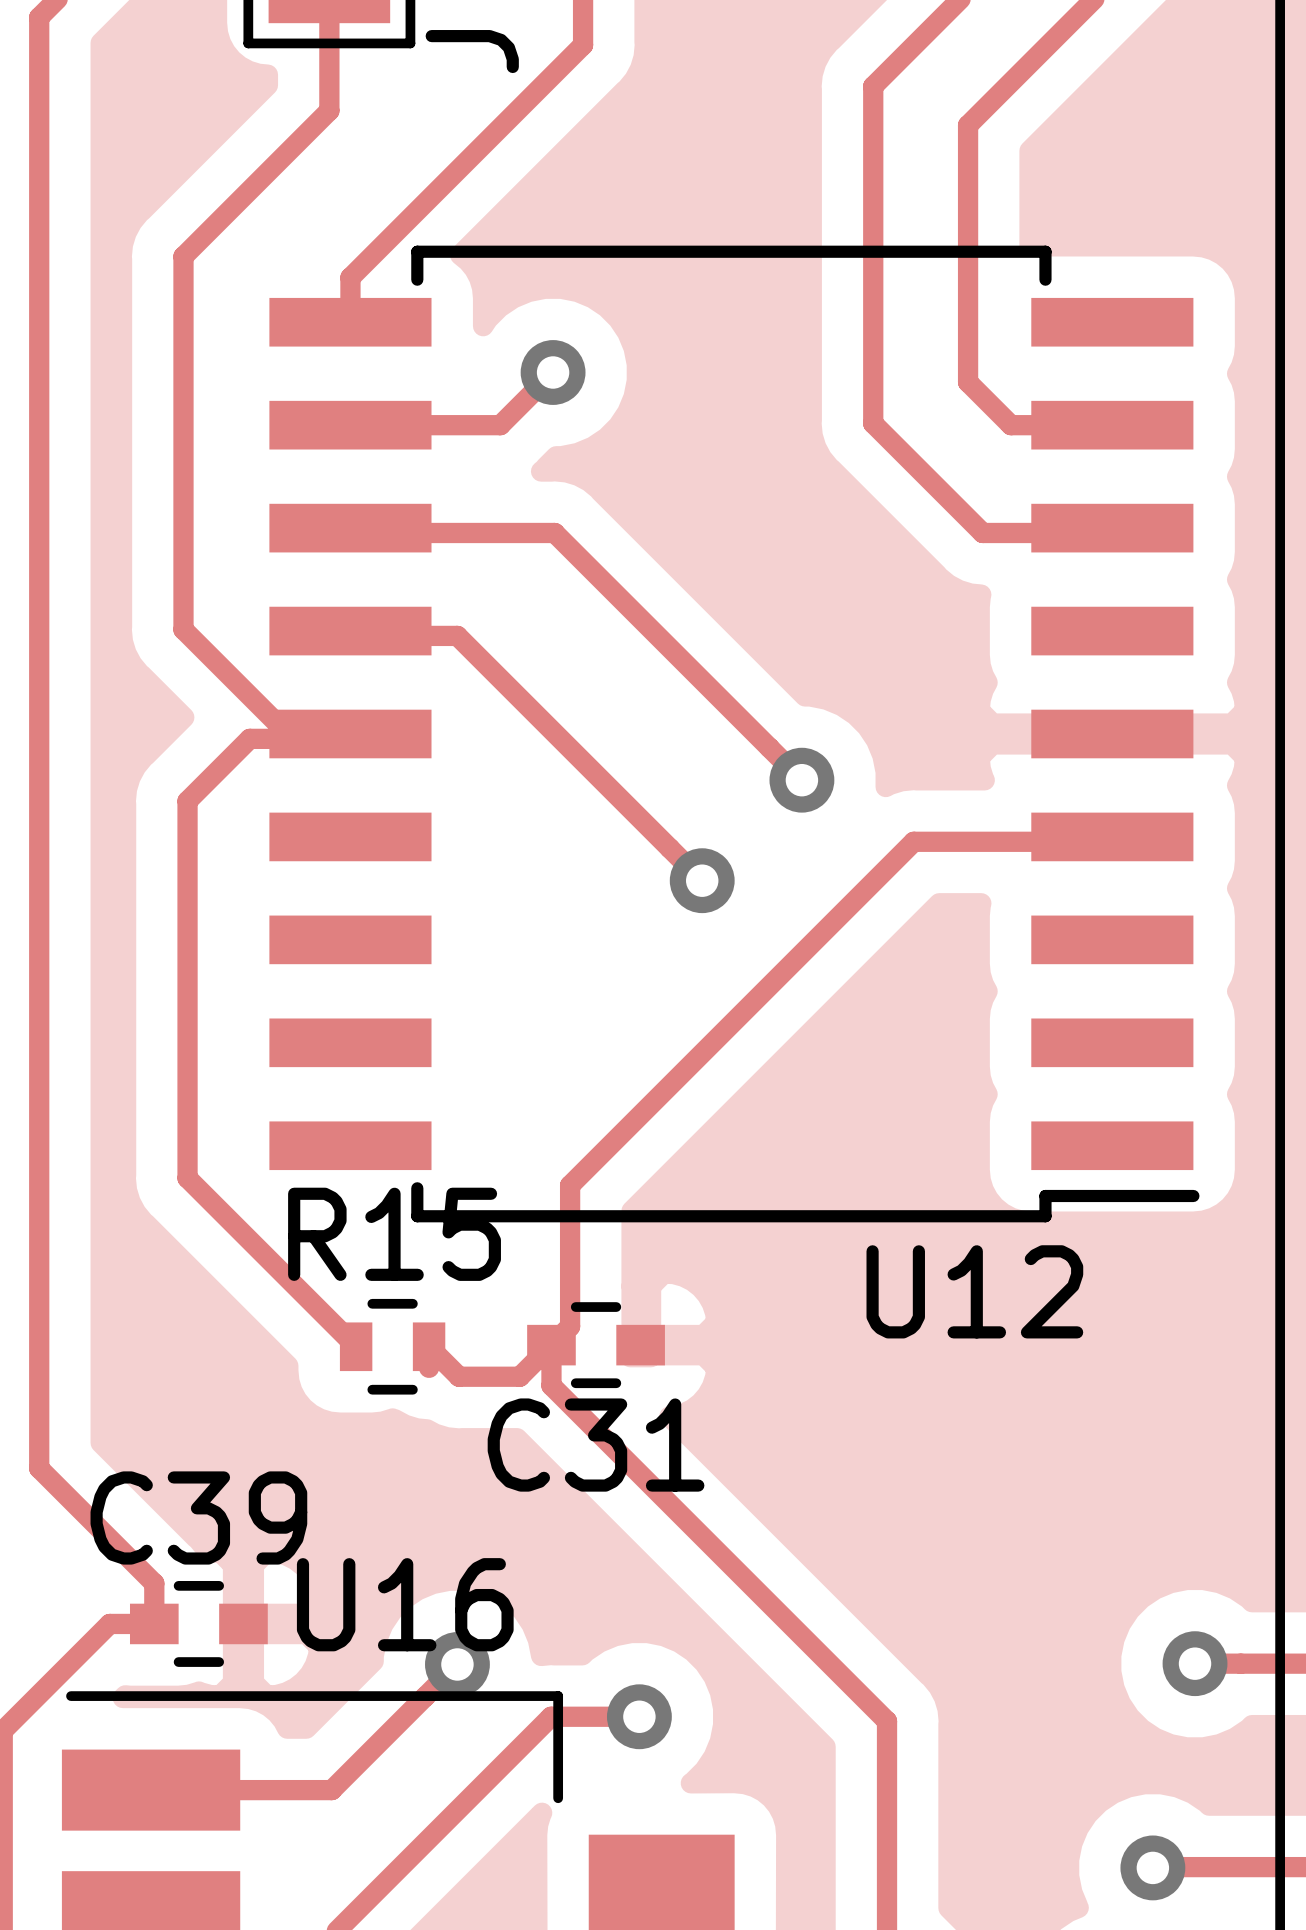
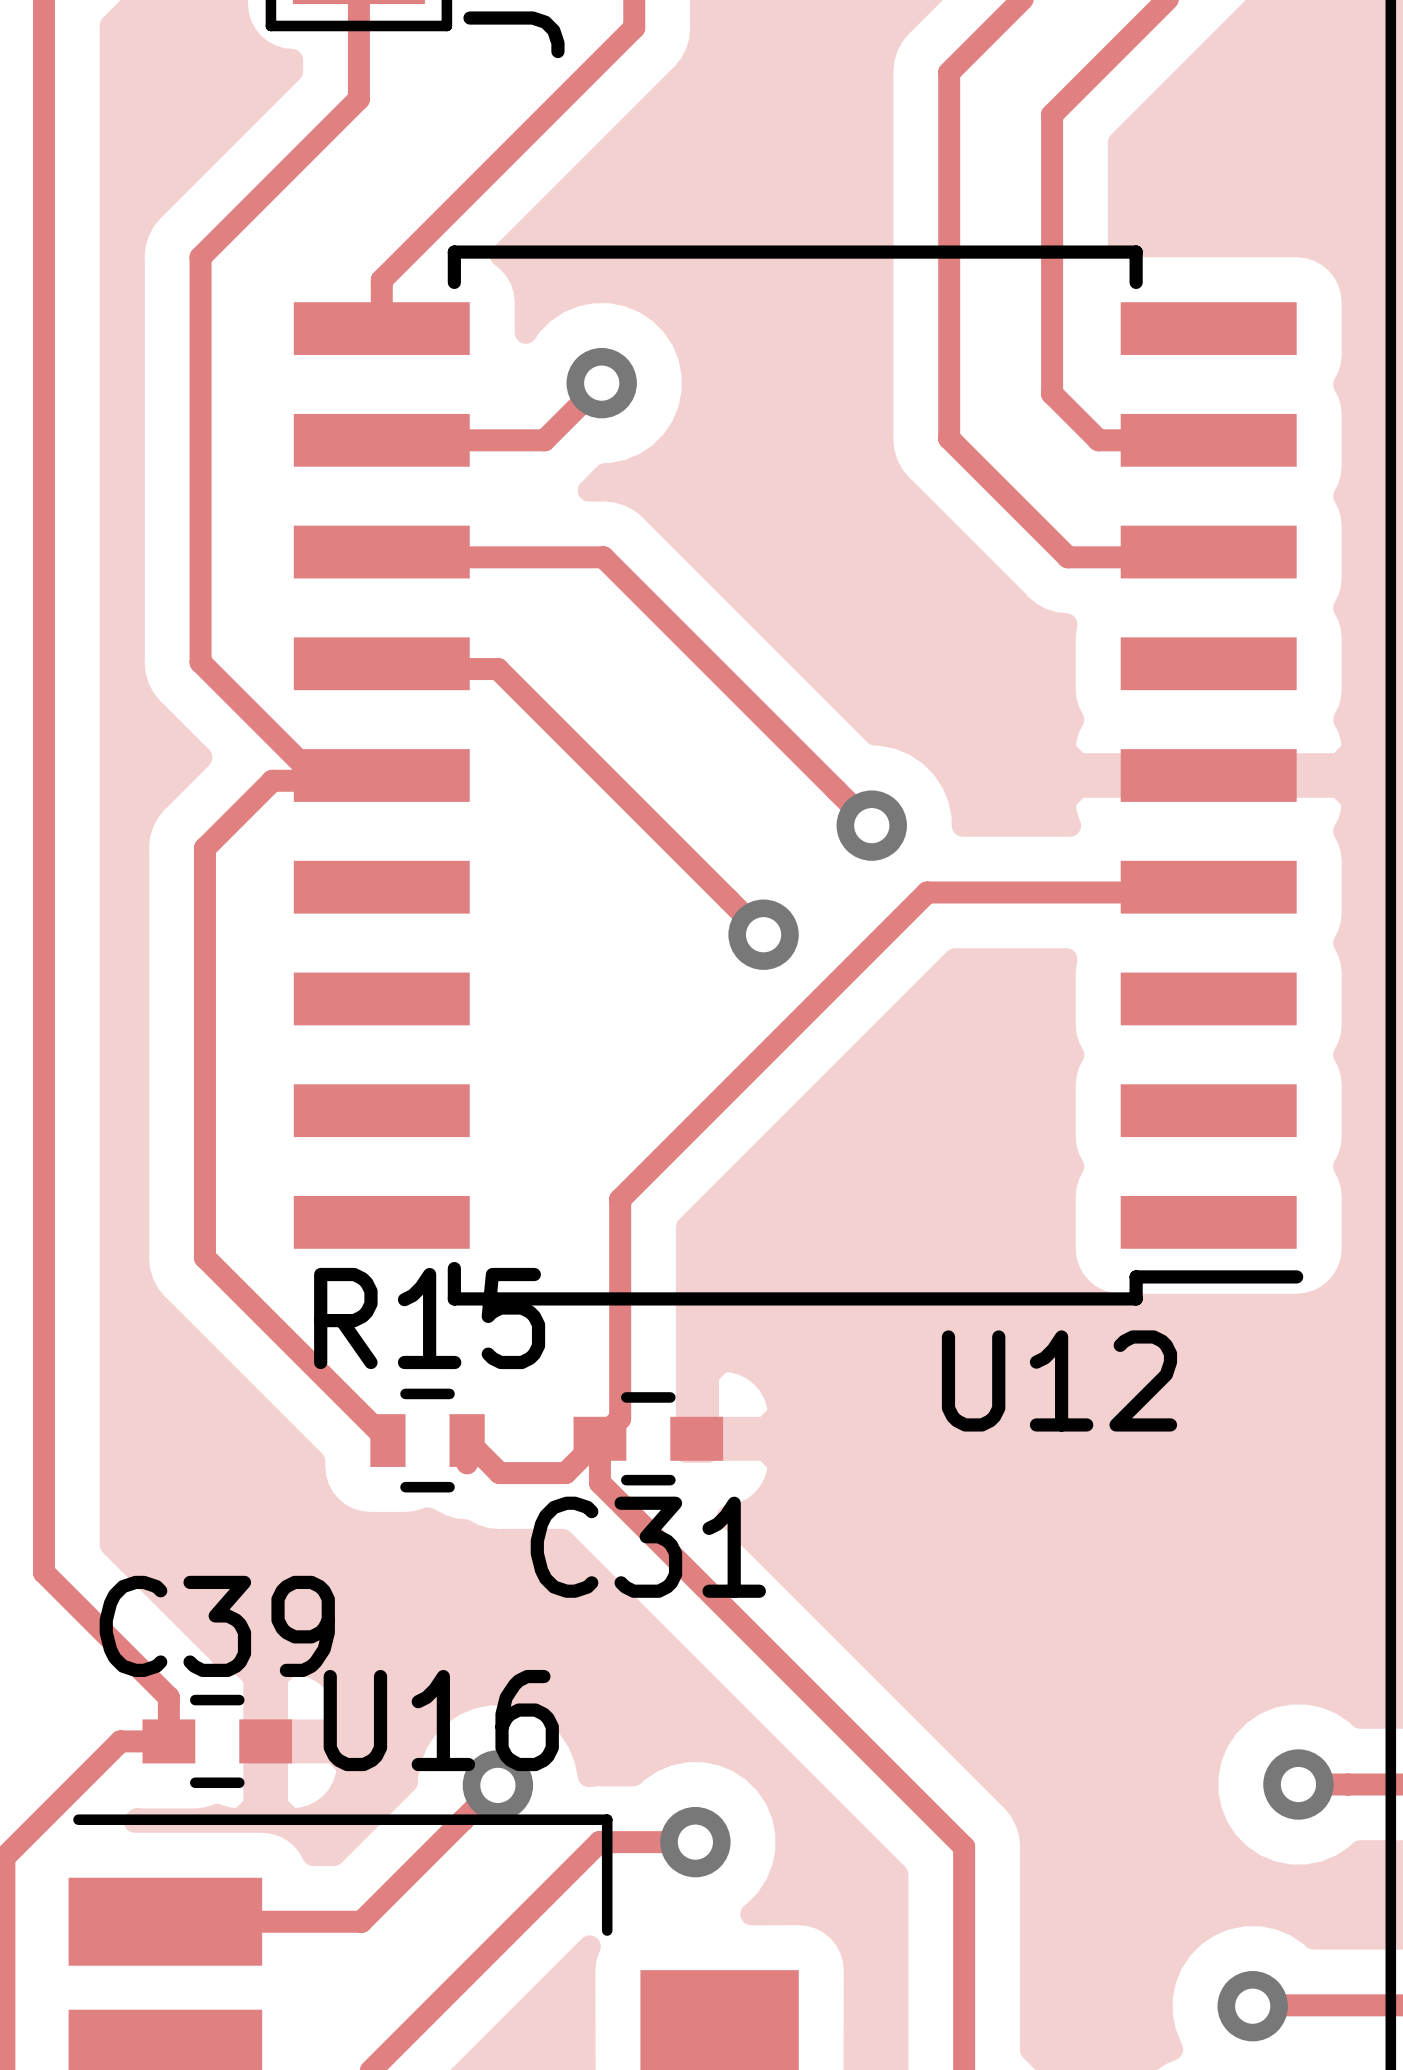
track: (913, 841) (570, 1185) -> (993, 892) (927, 892) (620, 1199) (620, 1265)

